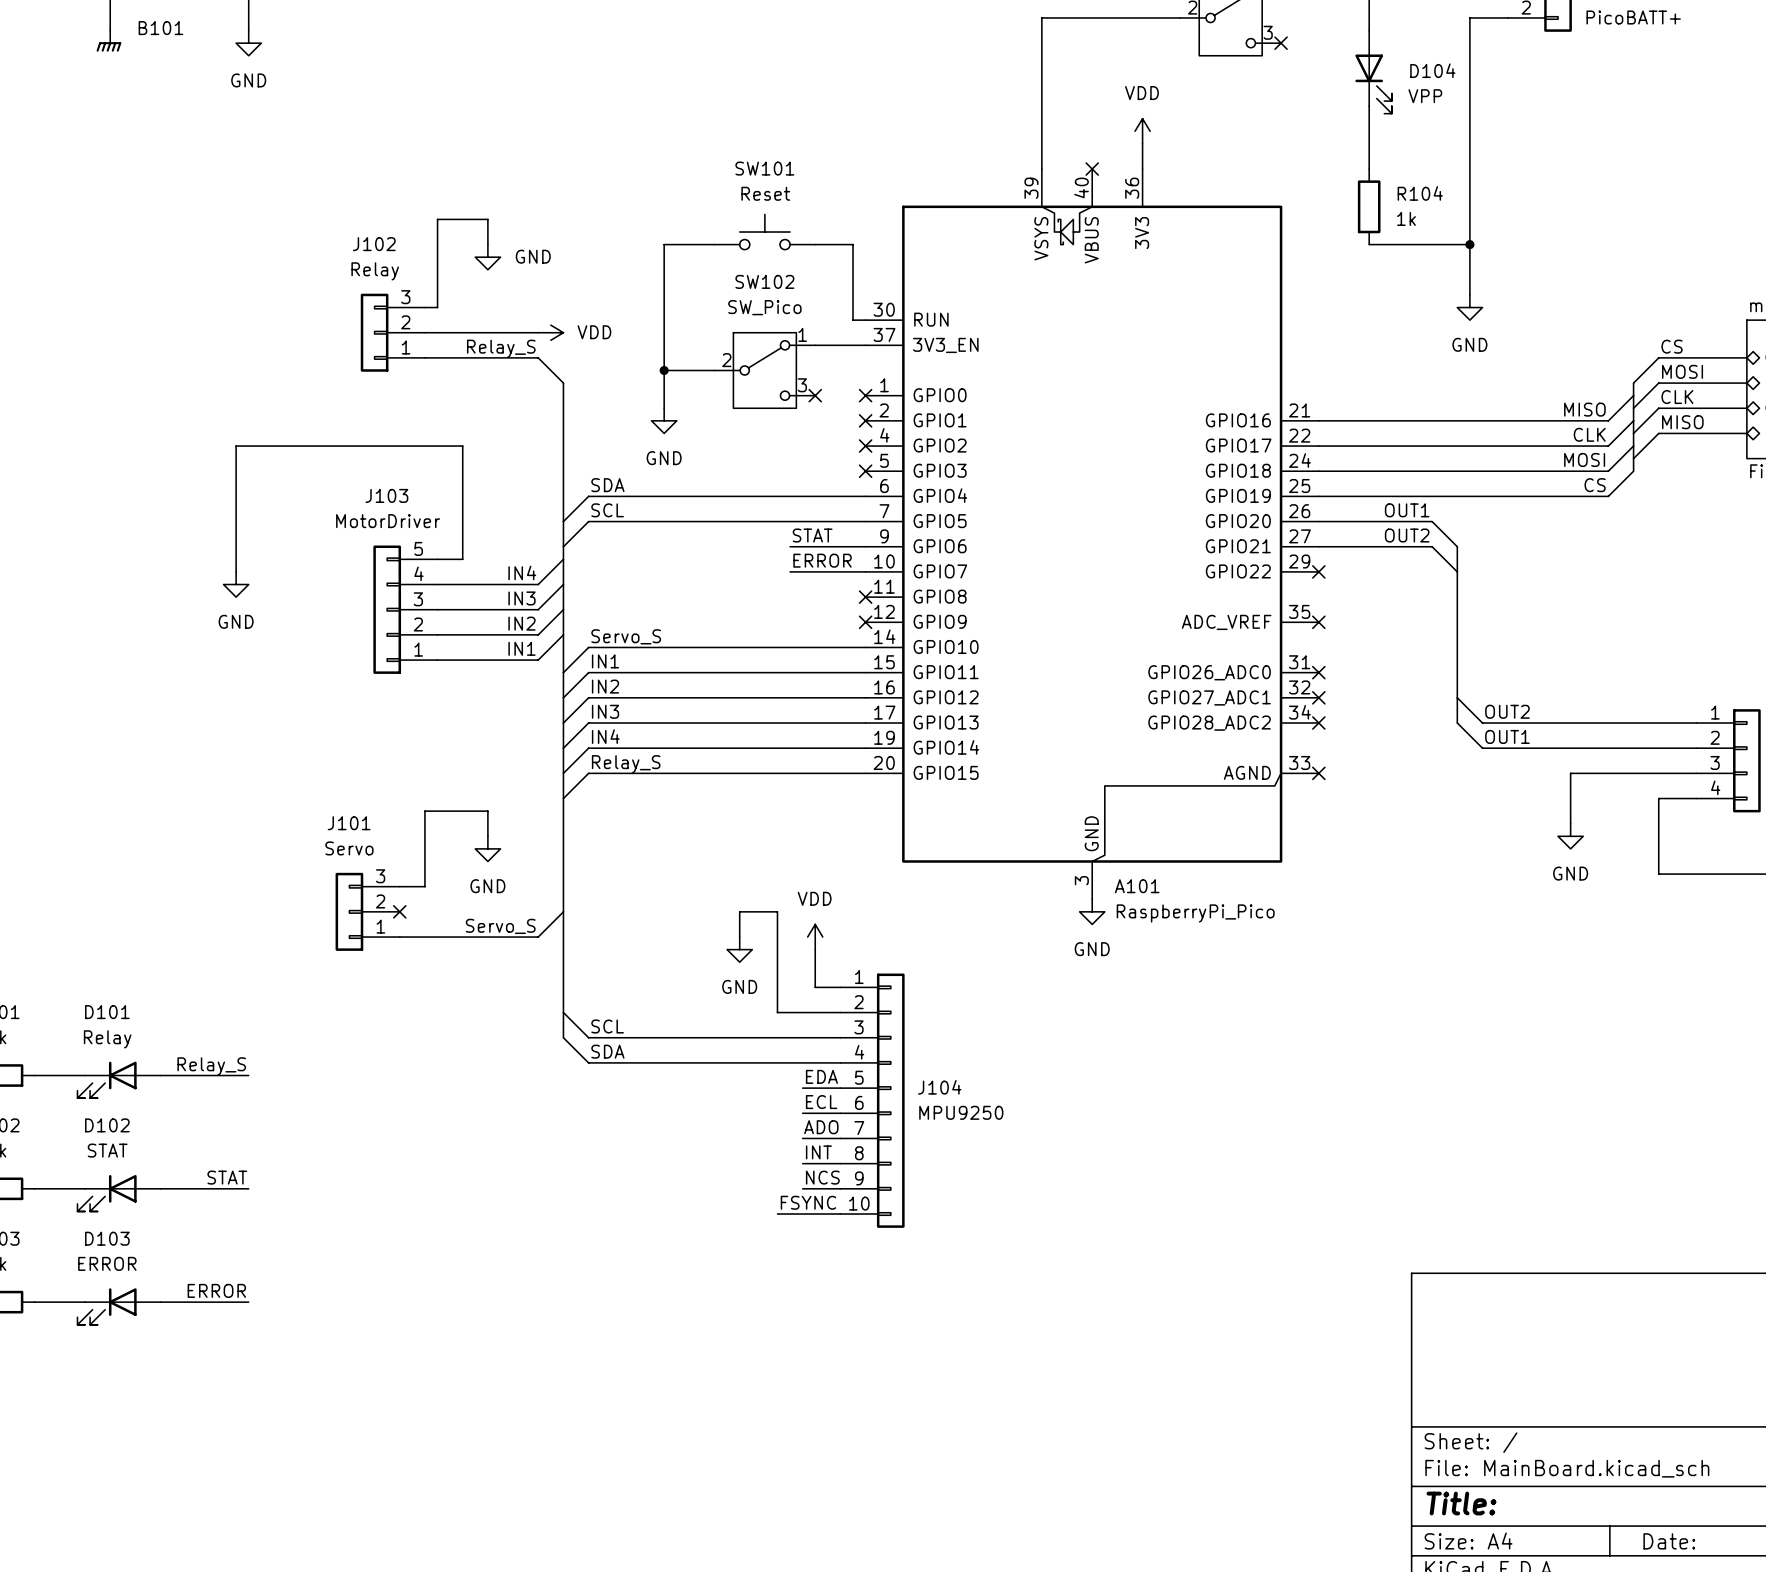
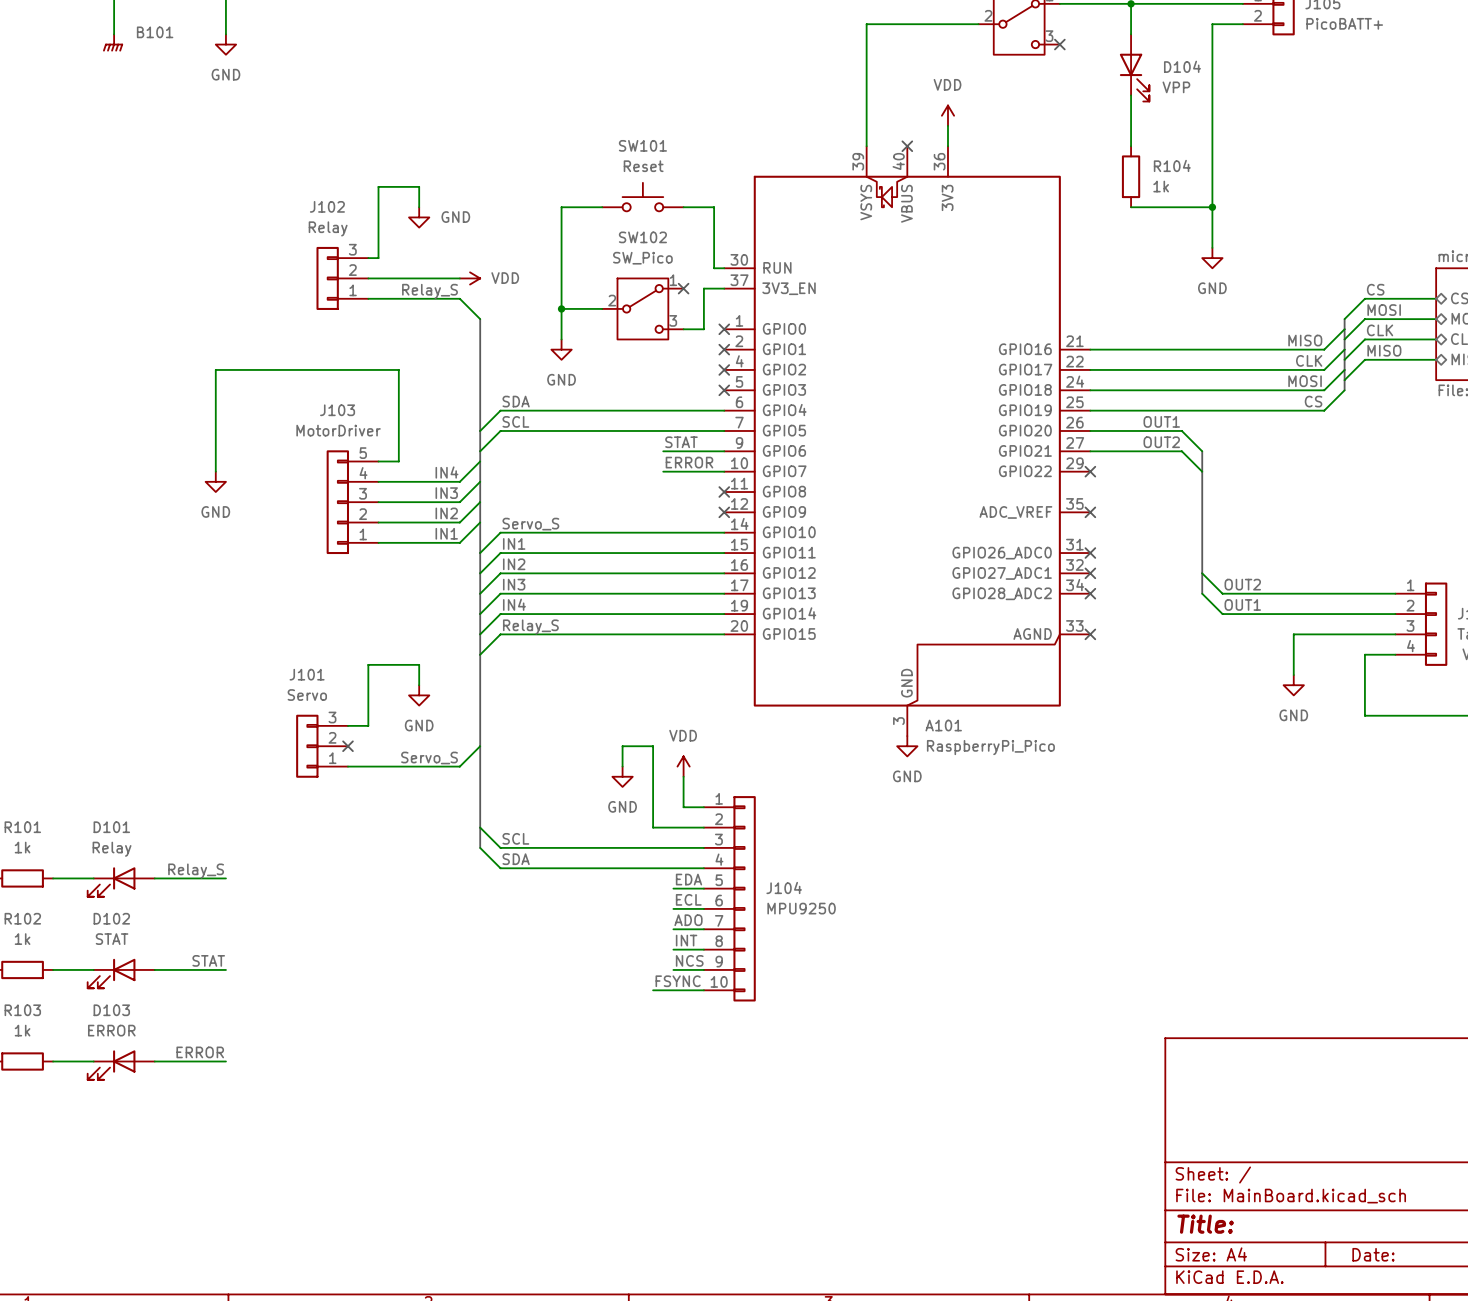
wire: (815, 345) (840, 345) -> (683, 329) (703, 329) (703, 288)
no-connect mark position: (815, 395) -> (683, 288)

